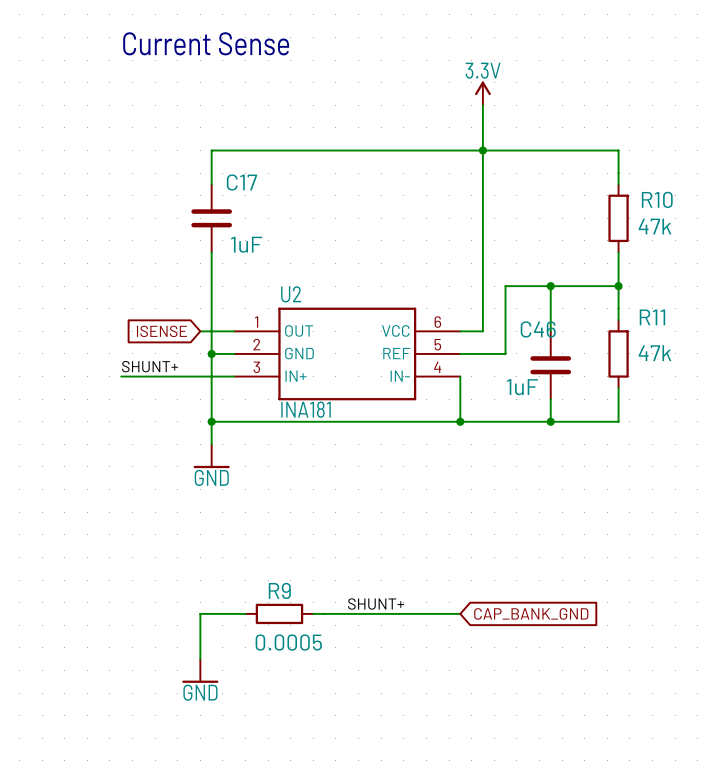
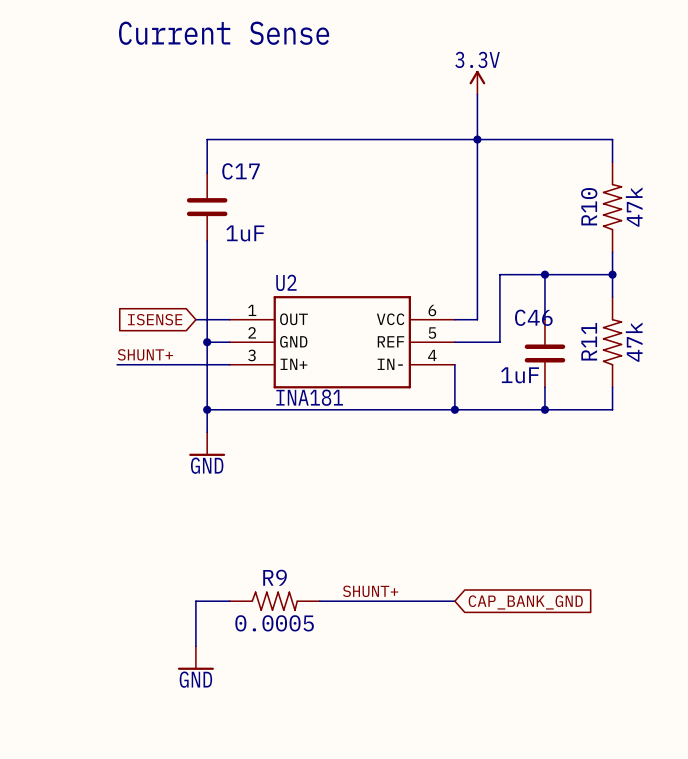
R10 symbol: [608, 184, 629, 253] -> [602, 162, 623, 253]
R10 name position: R10 (657, 199) -> R10 (589, 206)
R11 name position: R11 (652, 317) -> R11 (589, 341)
R11 symbol: [608, 320, 629, 388] -> [602, 297, 623, 388]
R9 symbol: [245, 603, 314, 625] -> [229, 591, 320, 611]

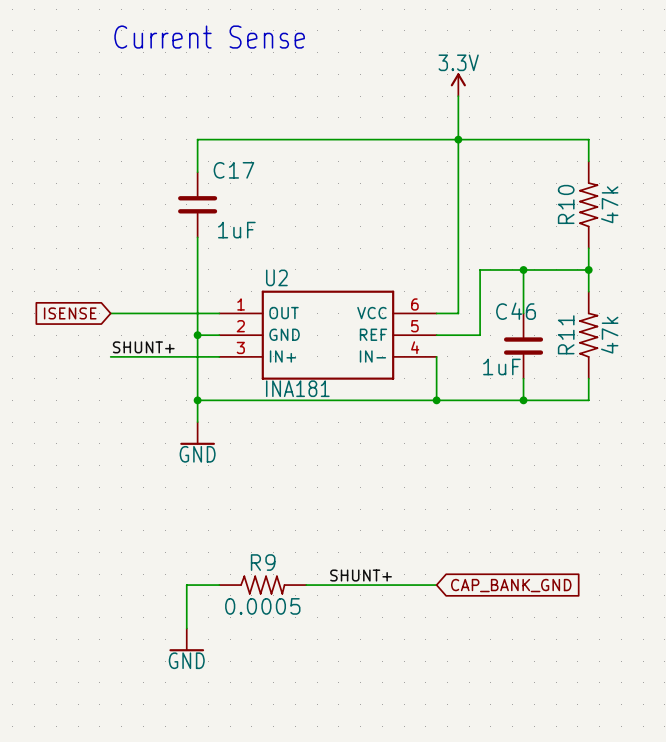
wire: none -> (110, 313) (186, 313)
global label position: ISENSE (155, 319) -> ISENSE (70, 313)

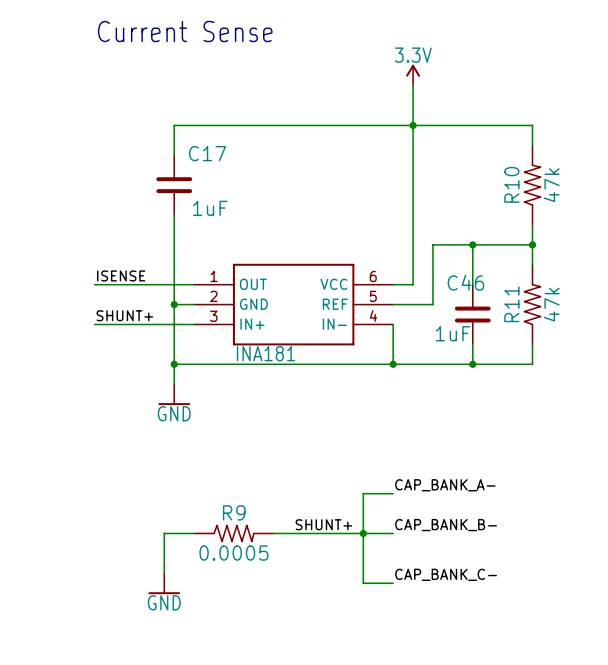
U2 name: U2 (276, 277) -> none
label: none -> ISENSE (121, 275)
global label: ISENSE (70, 313) -> none
label: none -> CAP_BANK_A- (445, 485)
wire: none -> (393, 493) (363, 493) (363, 583) (393, 583)
label: none -> CAP_BANK_B- (446, 525)
junction: none -> (363, 533)
global label: CAP_BANK_GND (511, 585) -> none
label: none -> CAP_BANK_C- (446, 574)

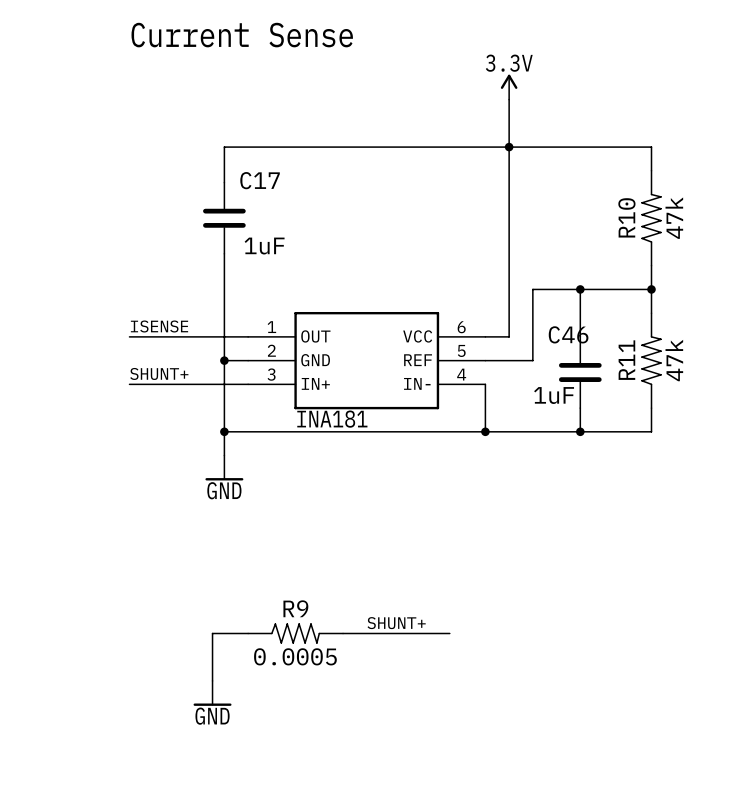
label: CAP_BANK_A- (445, 485) -> none
wire: (393, 493) (363, 493) (363, 583) (393, 583) -> none
label: CAP_BANK_B- (446, 525) -> none
wire: (363, 533) (393, 533) -> none
junction: (363, 533) -> none
label: CAP_BANK_C- (446, 574) -> none

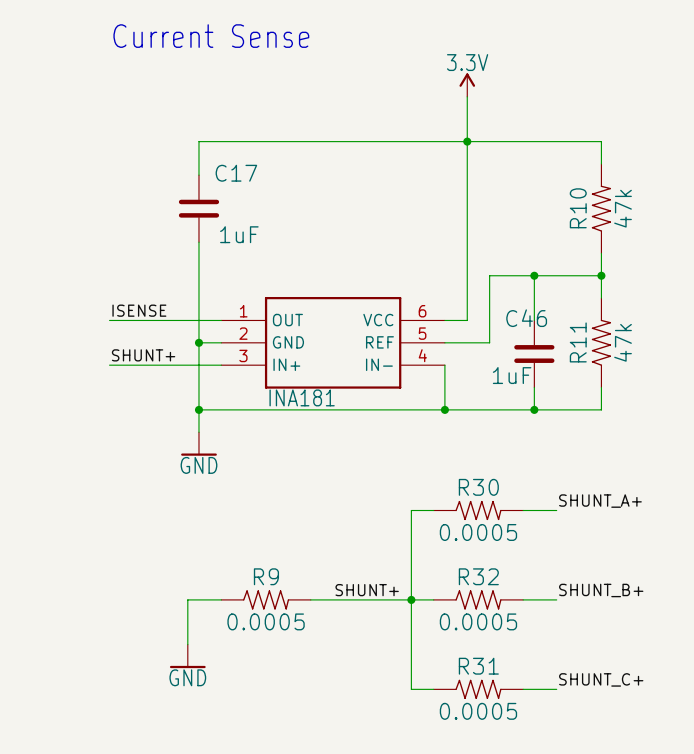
label: none -> SHUNT_A+ (600, 501)
wire: none -> (433, 510) (411, 510) (411, 689) (433, 689)
R30: none -> 0.0005 (478, 510)
wire: none -> (523, 510) (556, 510)
label: none -> SHUNT_B+ (601, 590)
wire: none -> (411, 599) (433, 599)
junction: none -> (411, 599)
R32: none -> 0.0005 (478, 599)
wire: none -> (523, 599) (556, 599)
label: none -> SHUNT_C+ (601, 679)
R31: none -> 0.0005 (478, 689)
wire: none -> (523, 689) (556, 689)

